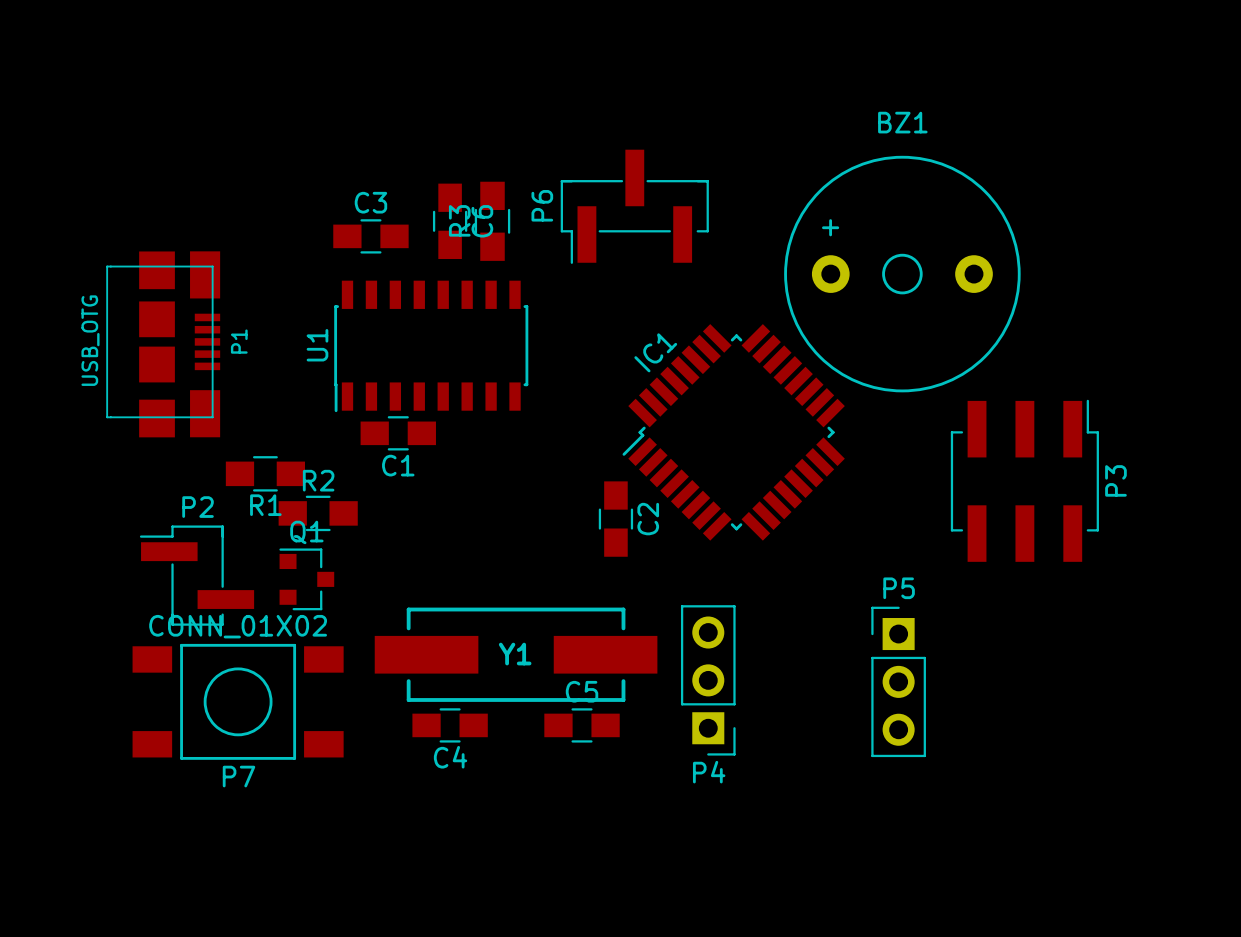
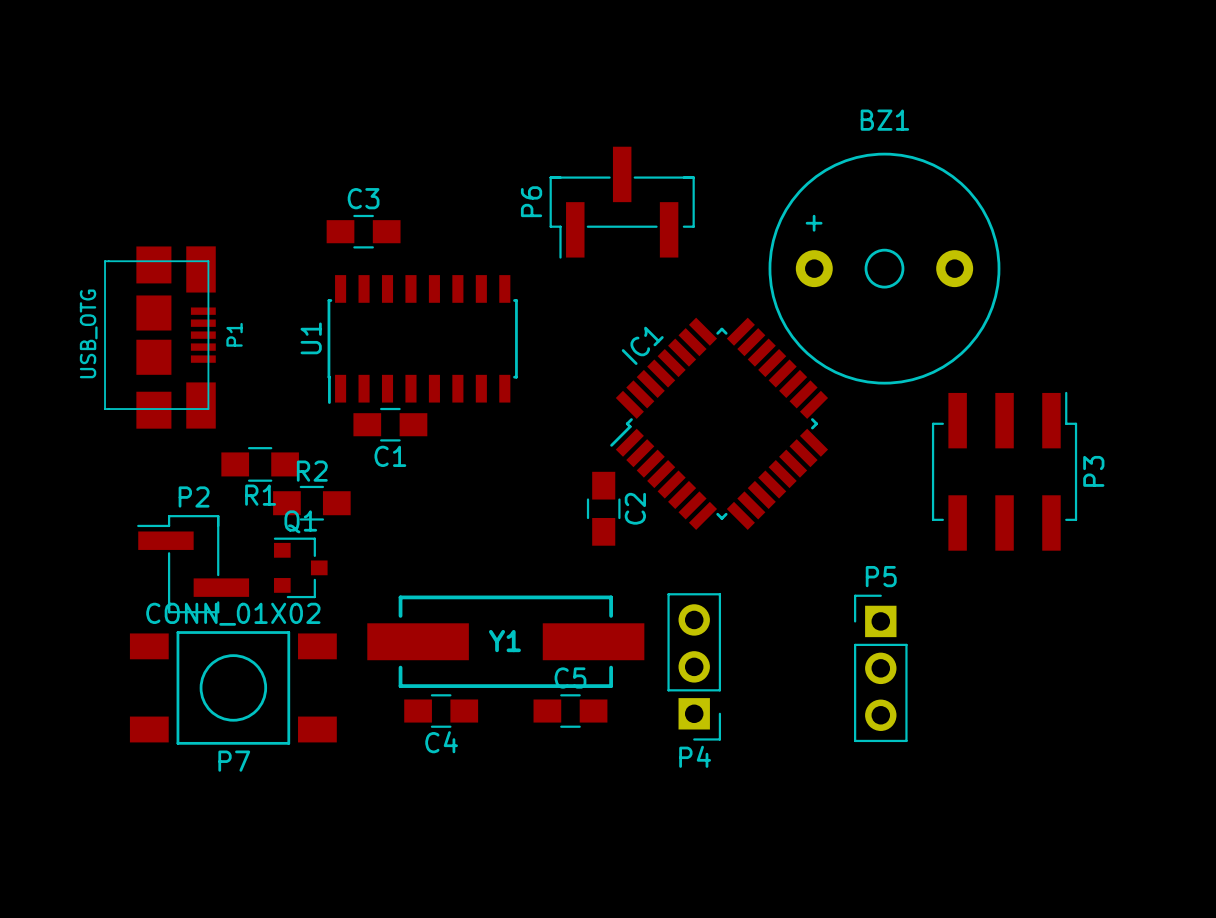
C6: (450, 221) -> none
R3: (492, 221) -> none

